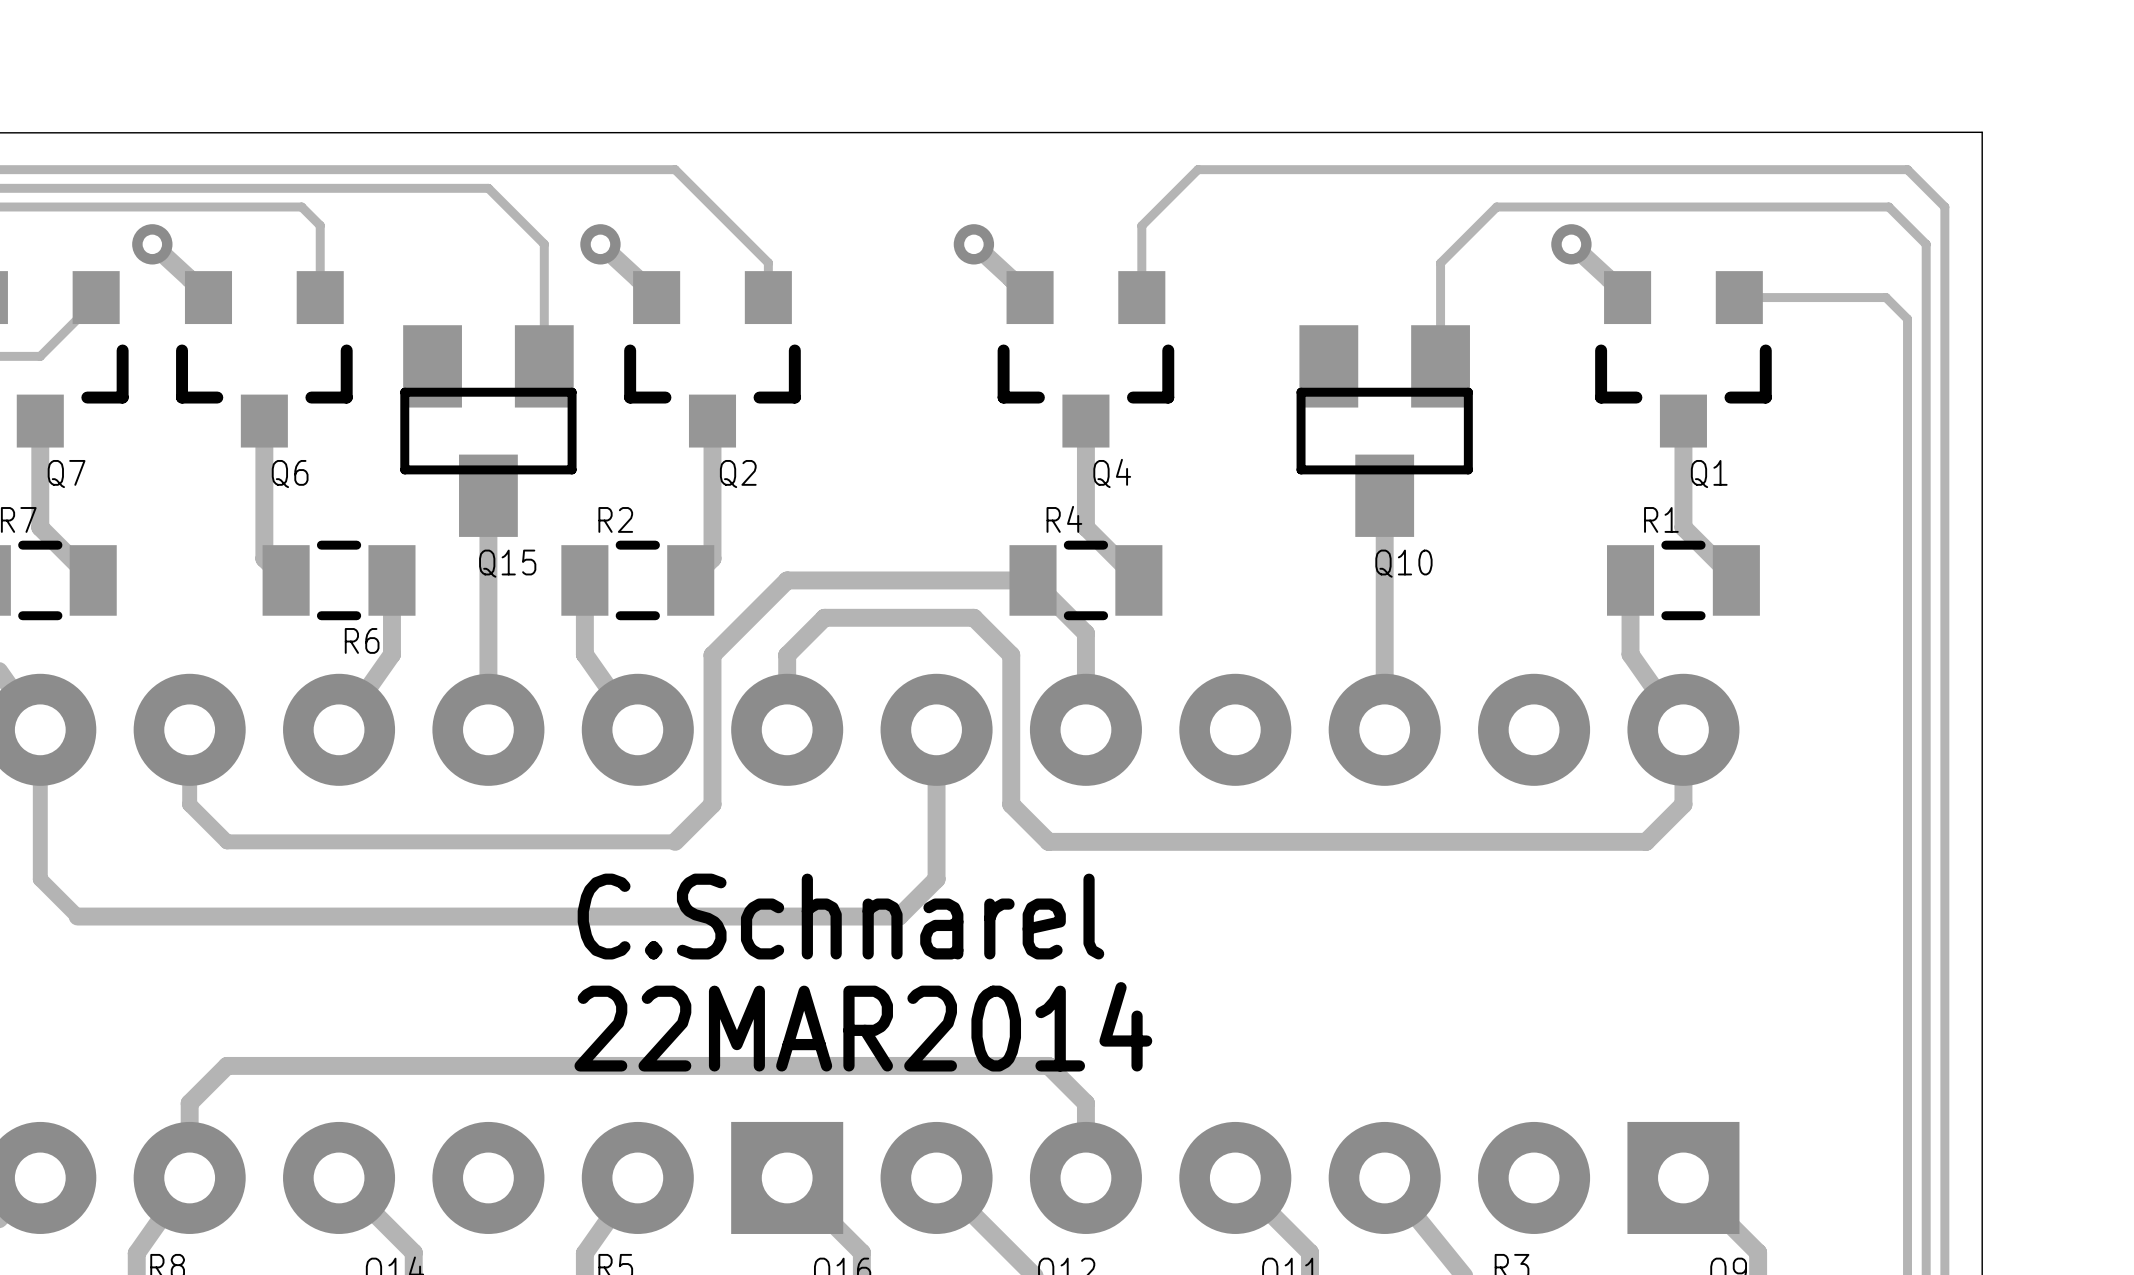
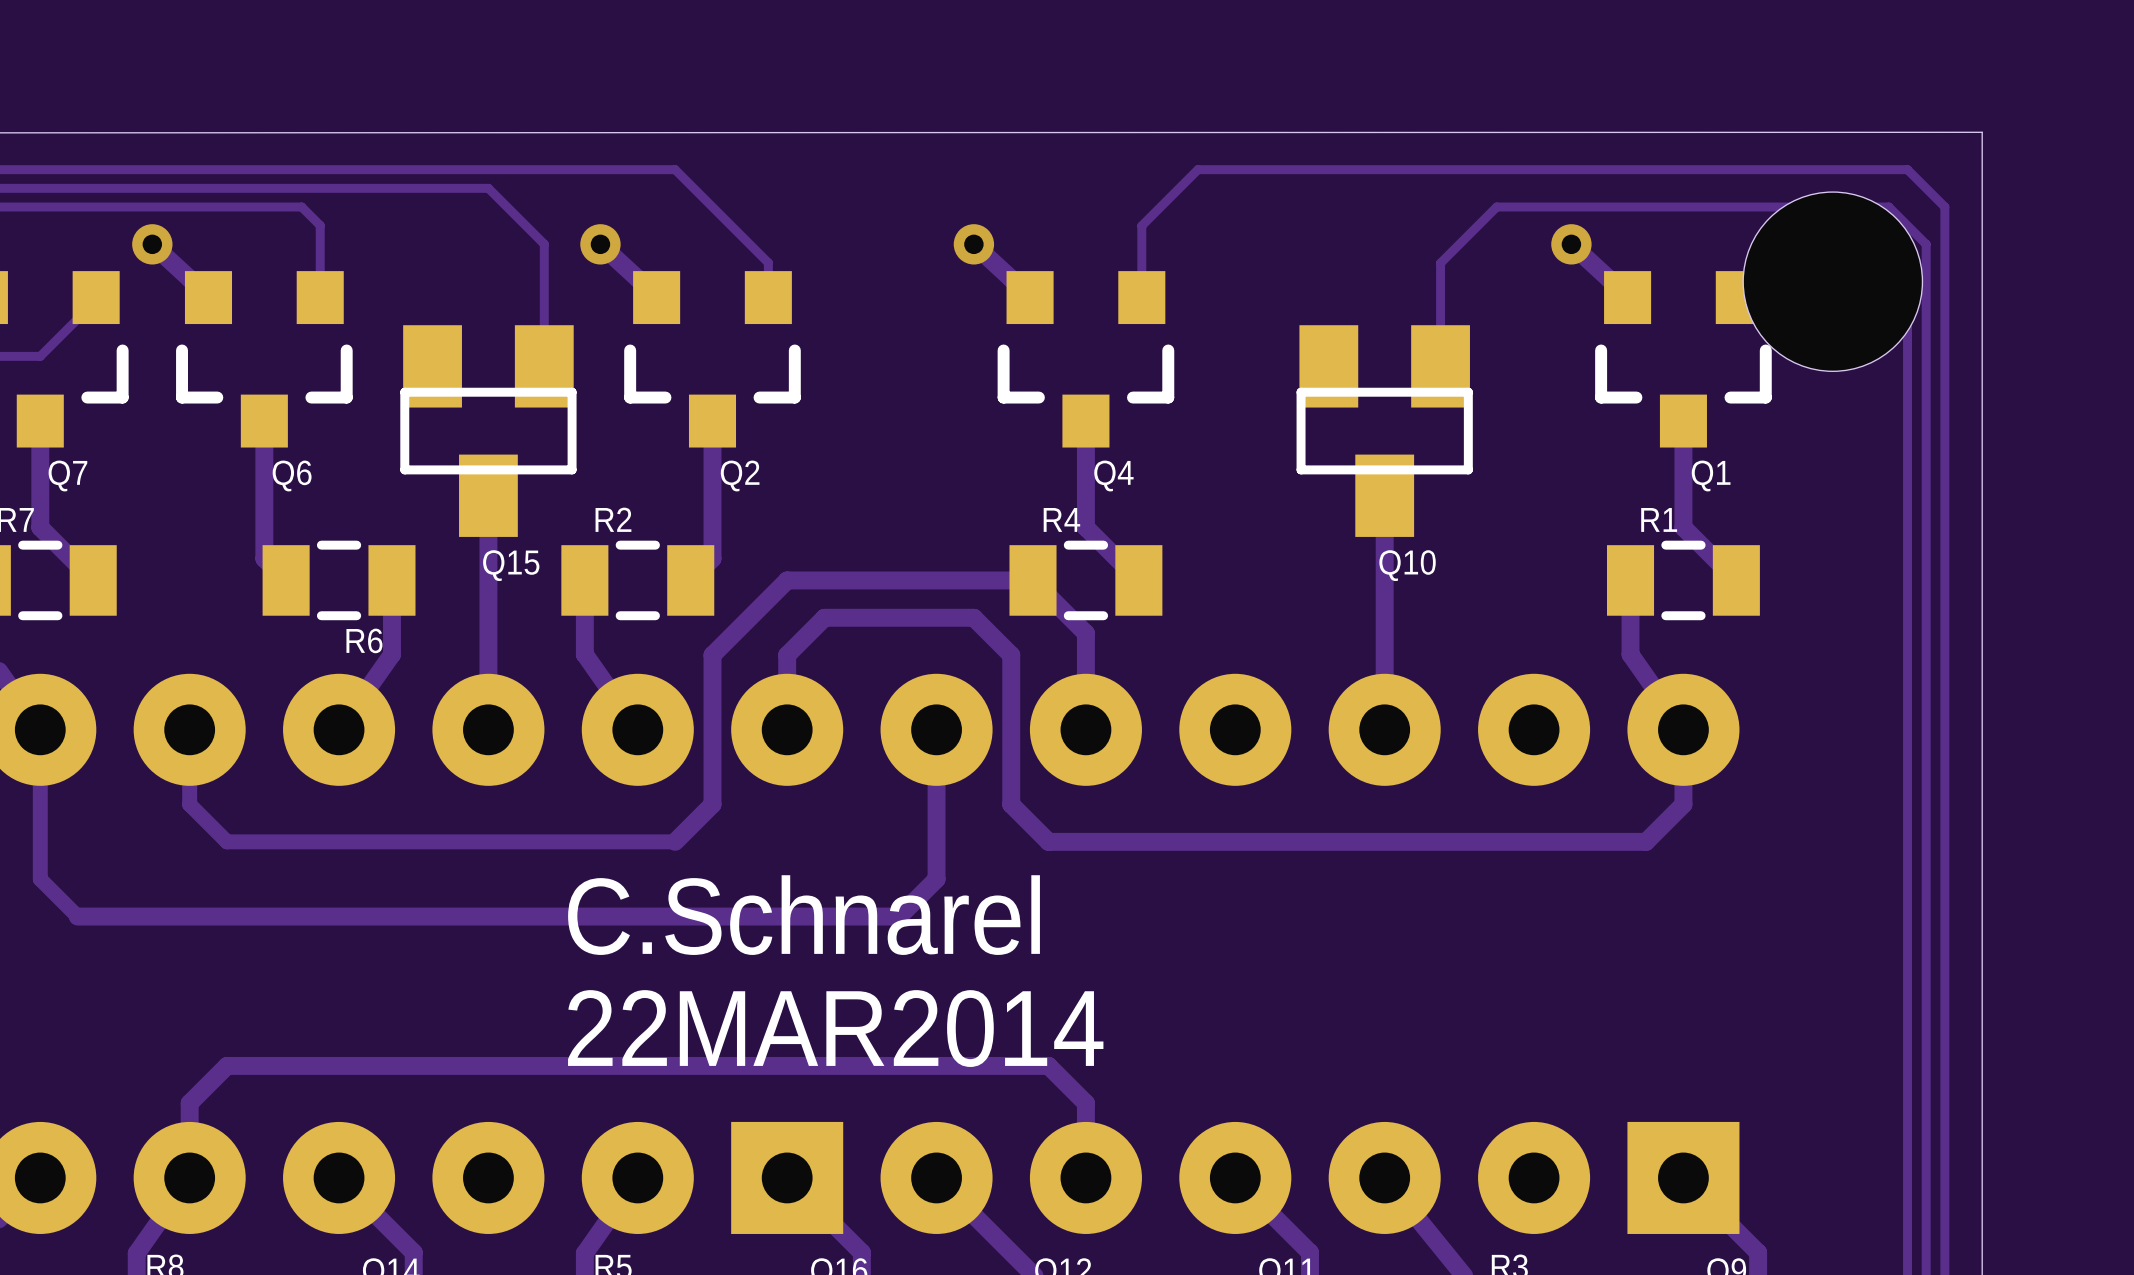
part: none -> (1832, 281)

